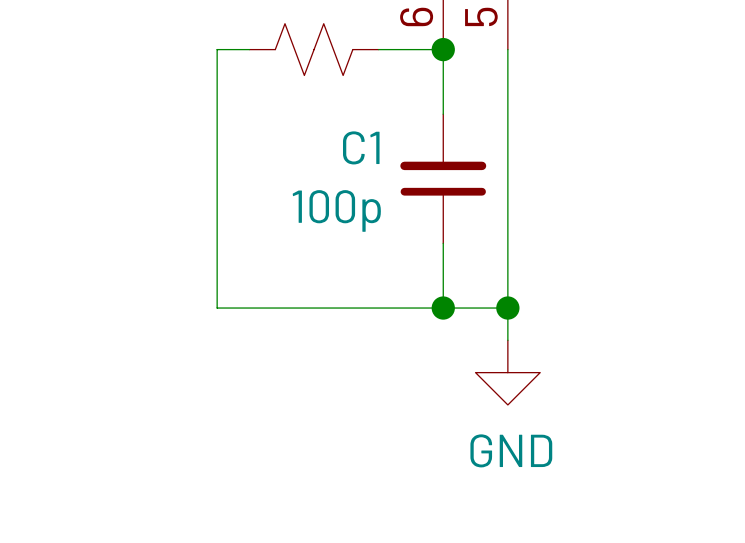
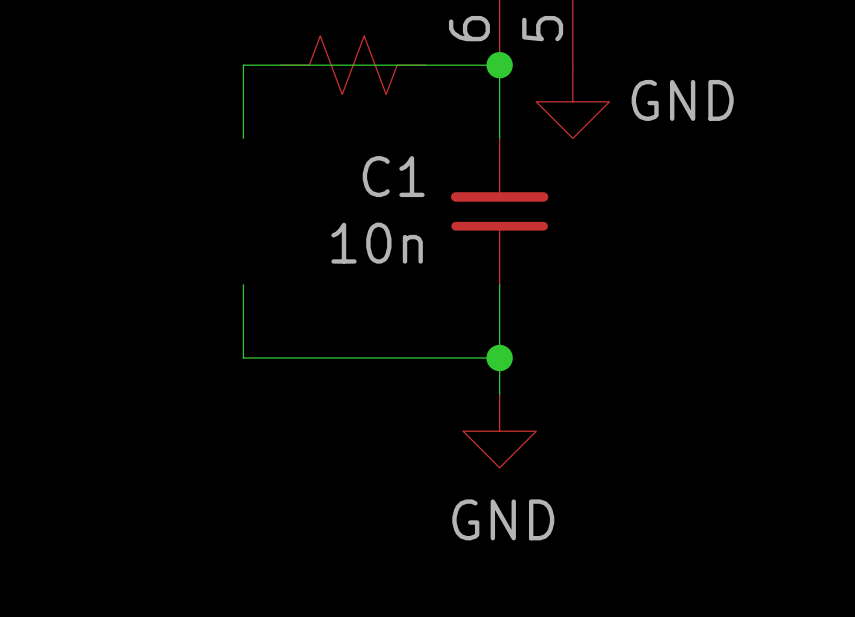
wire: none -> (280, 65) (426, 65)
wire: (507, 49) (507, 340) -> none
power symbol: none -> GND (572, 101)
wire: (217, 114) (217, 243) -> none
C1 value: 100p (336, 210) -> 10n (377, 243)
wire: (443, 308) (507, 308) -> (499, 358) (499, 394)
junction: (507, 308) -> none
power symbol position: GND (507, 372) -> GND (499, 431)

